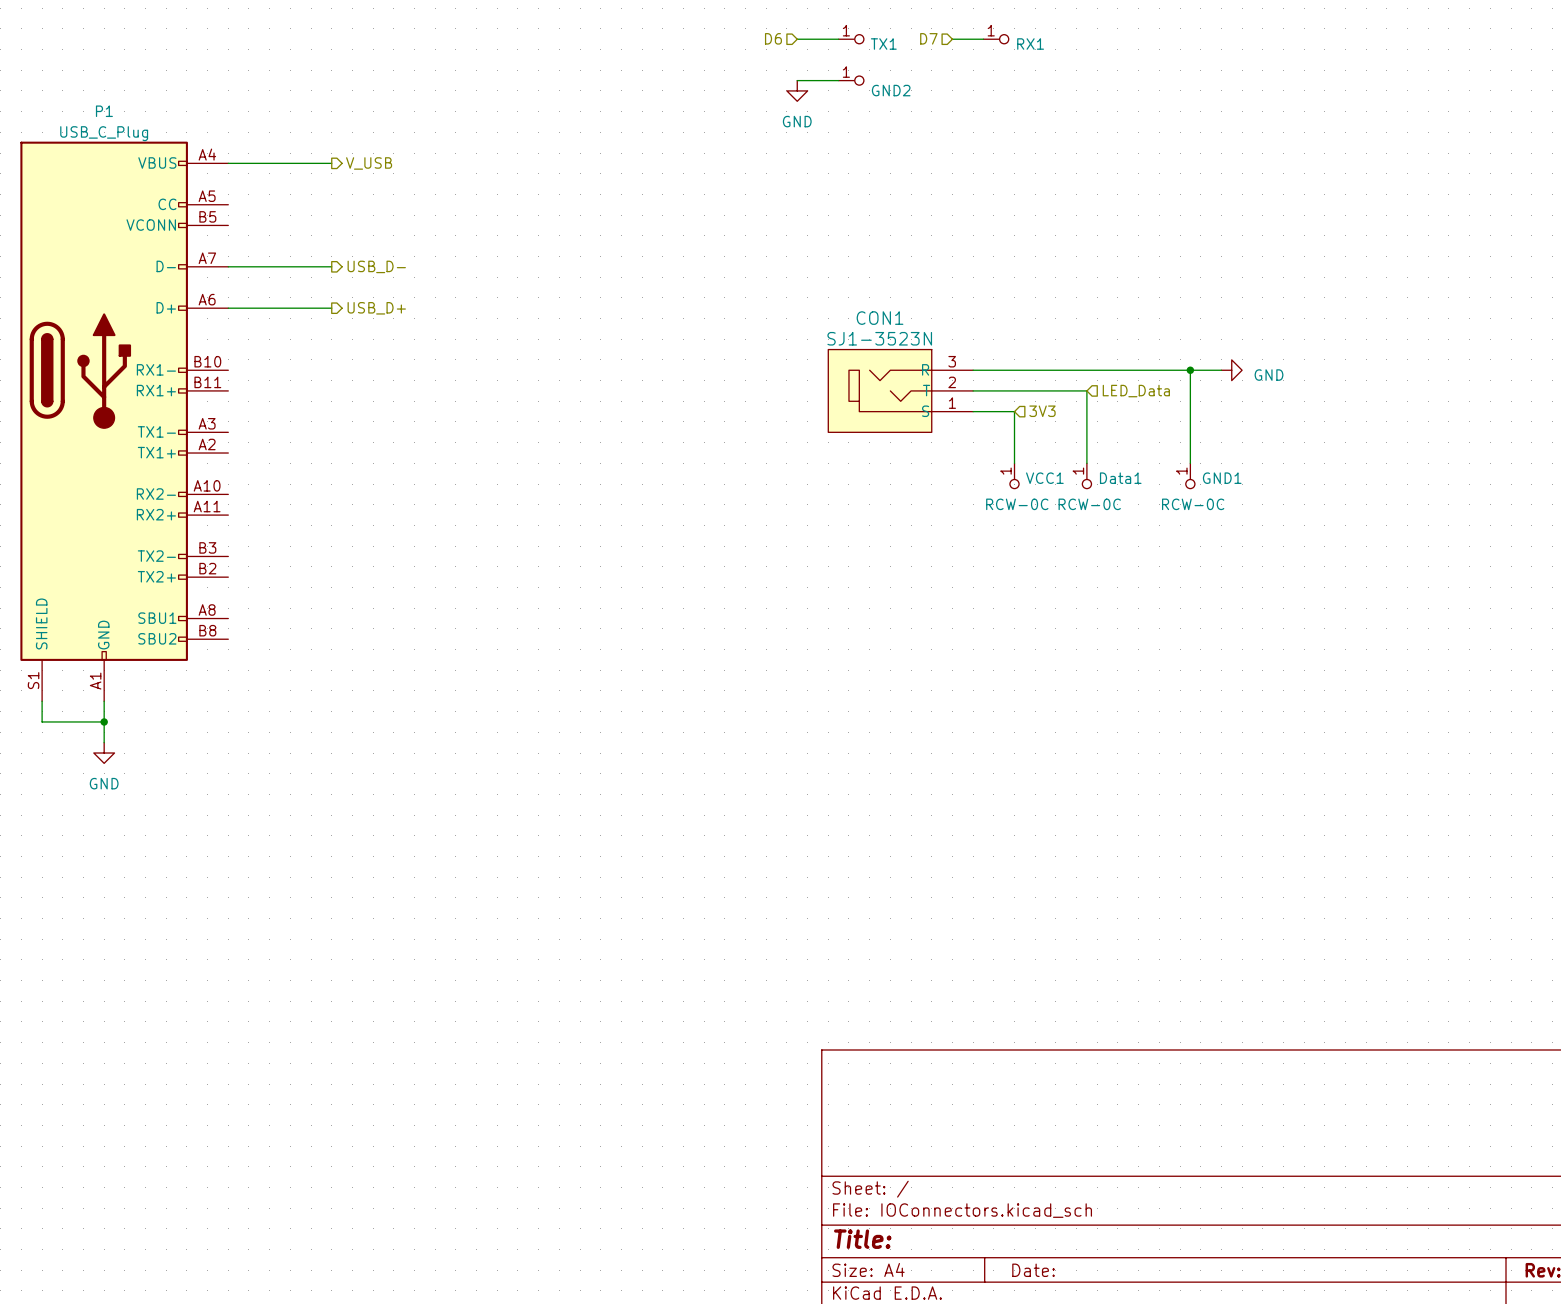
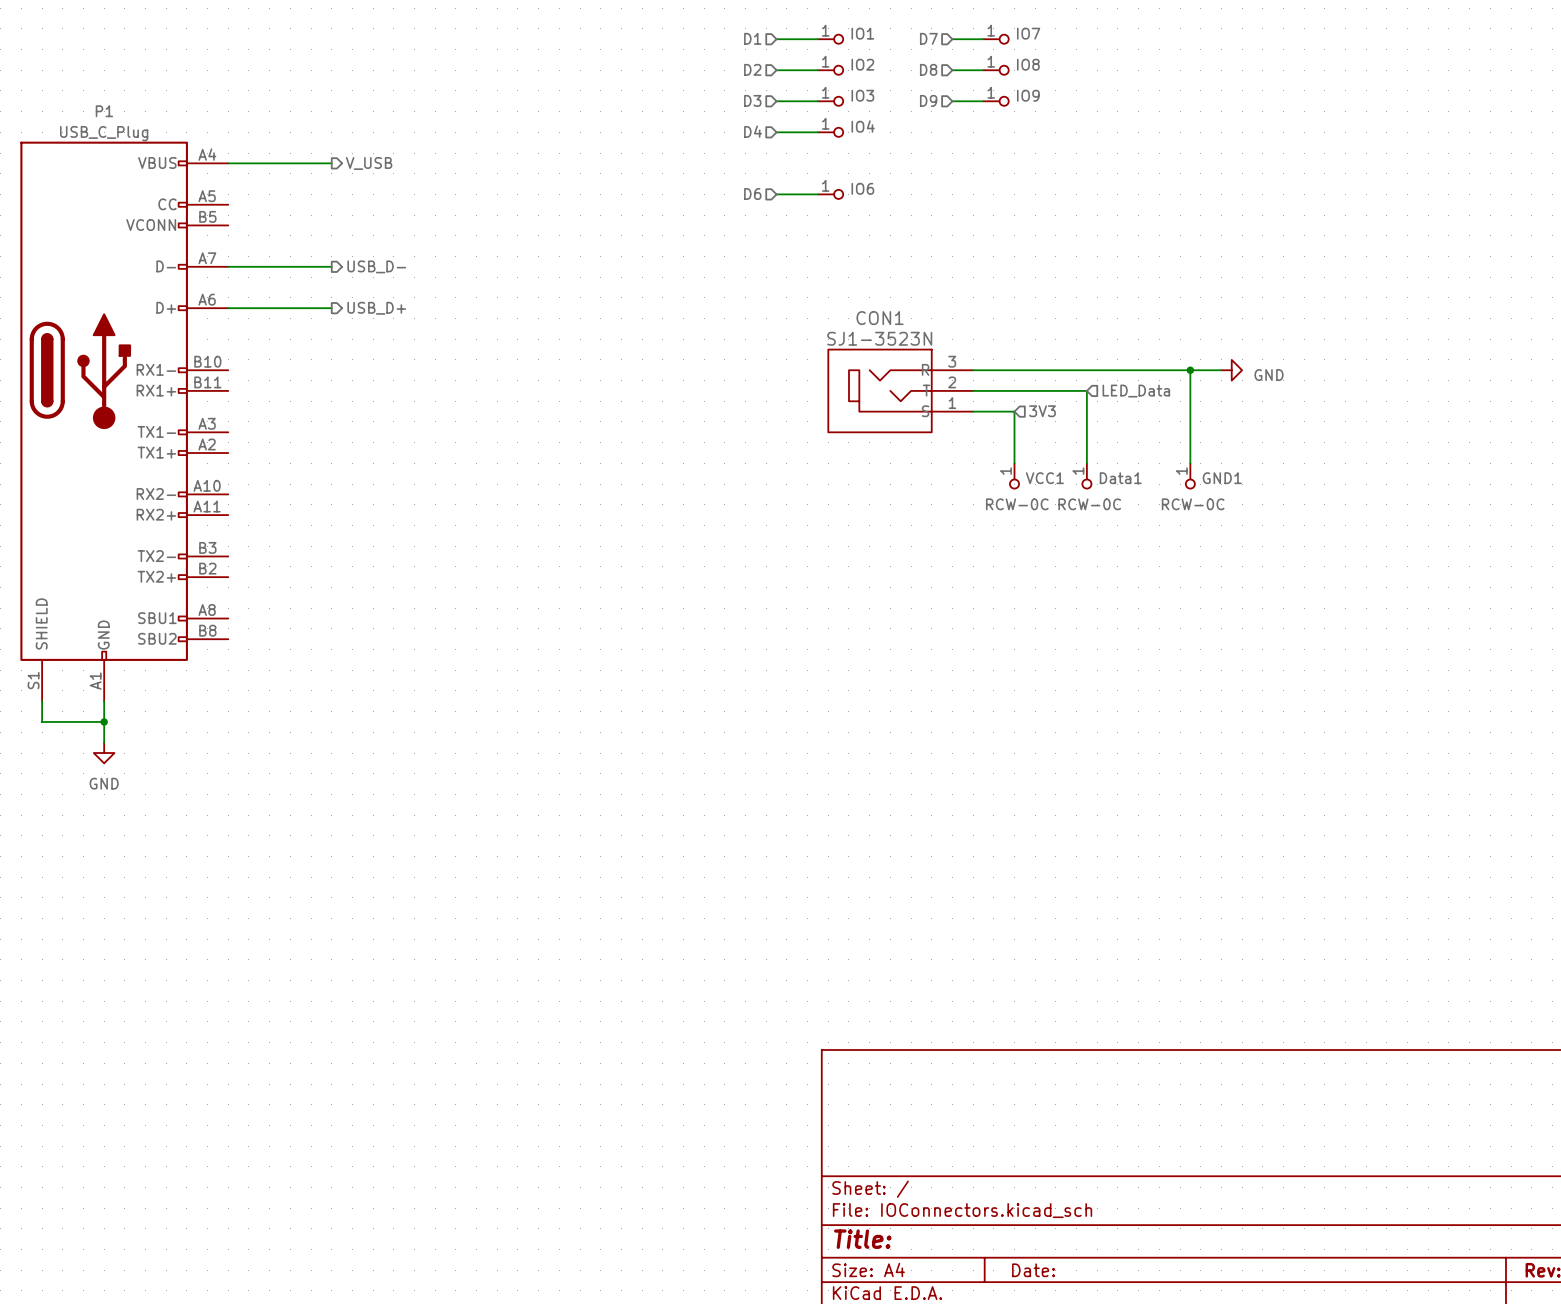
hierarchical label: none -> D1 (752, 38)
hierarchical label position: D6 (773, 38) -> D6 (752, 194)
IO1: none -> (830, 39)
TX1: (851, 39) -> none
RX1 name: RX1 (1030, 44) -> IO7 (1028, 33)
hierarchical label: none -> D2 (752, 69)
hierarchical label: none -> D8 (928, 69)
IO2: none -> (830, 70)
wire: none -> (952, 70) (983, 70)
IO8: none -> (996, 70)
wire: (797, 80) (838, 80) -> (776, 70) (817, 70)
GND2: (851, 80) -> none
power symbol: GND (797, 90) -> none
hierarchical label: none -> D3 (752, 100)
hierarchical label: none -> D9 (928, 100)
wire: none -> (776, 101) (817, 101)
IO3: none -> (830, 101)
wire: none -> (952, 101) (983, 101)
IO9: none -> (996, 101)
hierarchical label: none -> D4 (753, 131)
wire: none -> (776, 132) (817, 132)
IO4: none -> (830, 132)
wire: none -> (776, 194) (817, 194)
IO6: none -> (830, 194)

